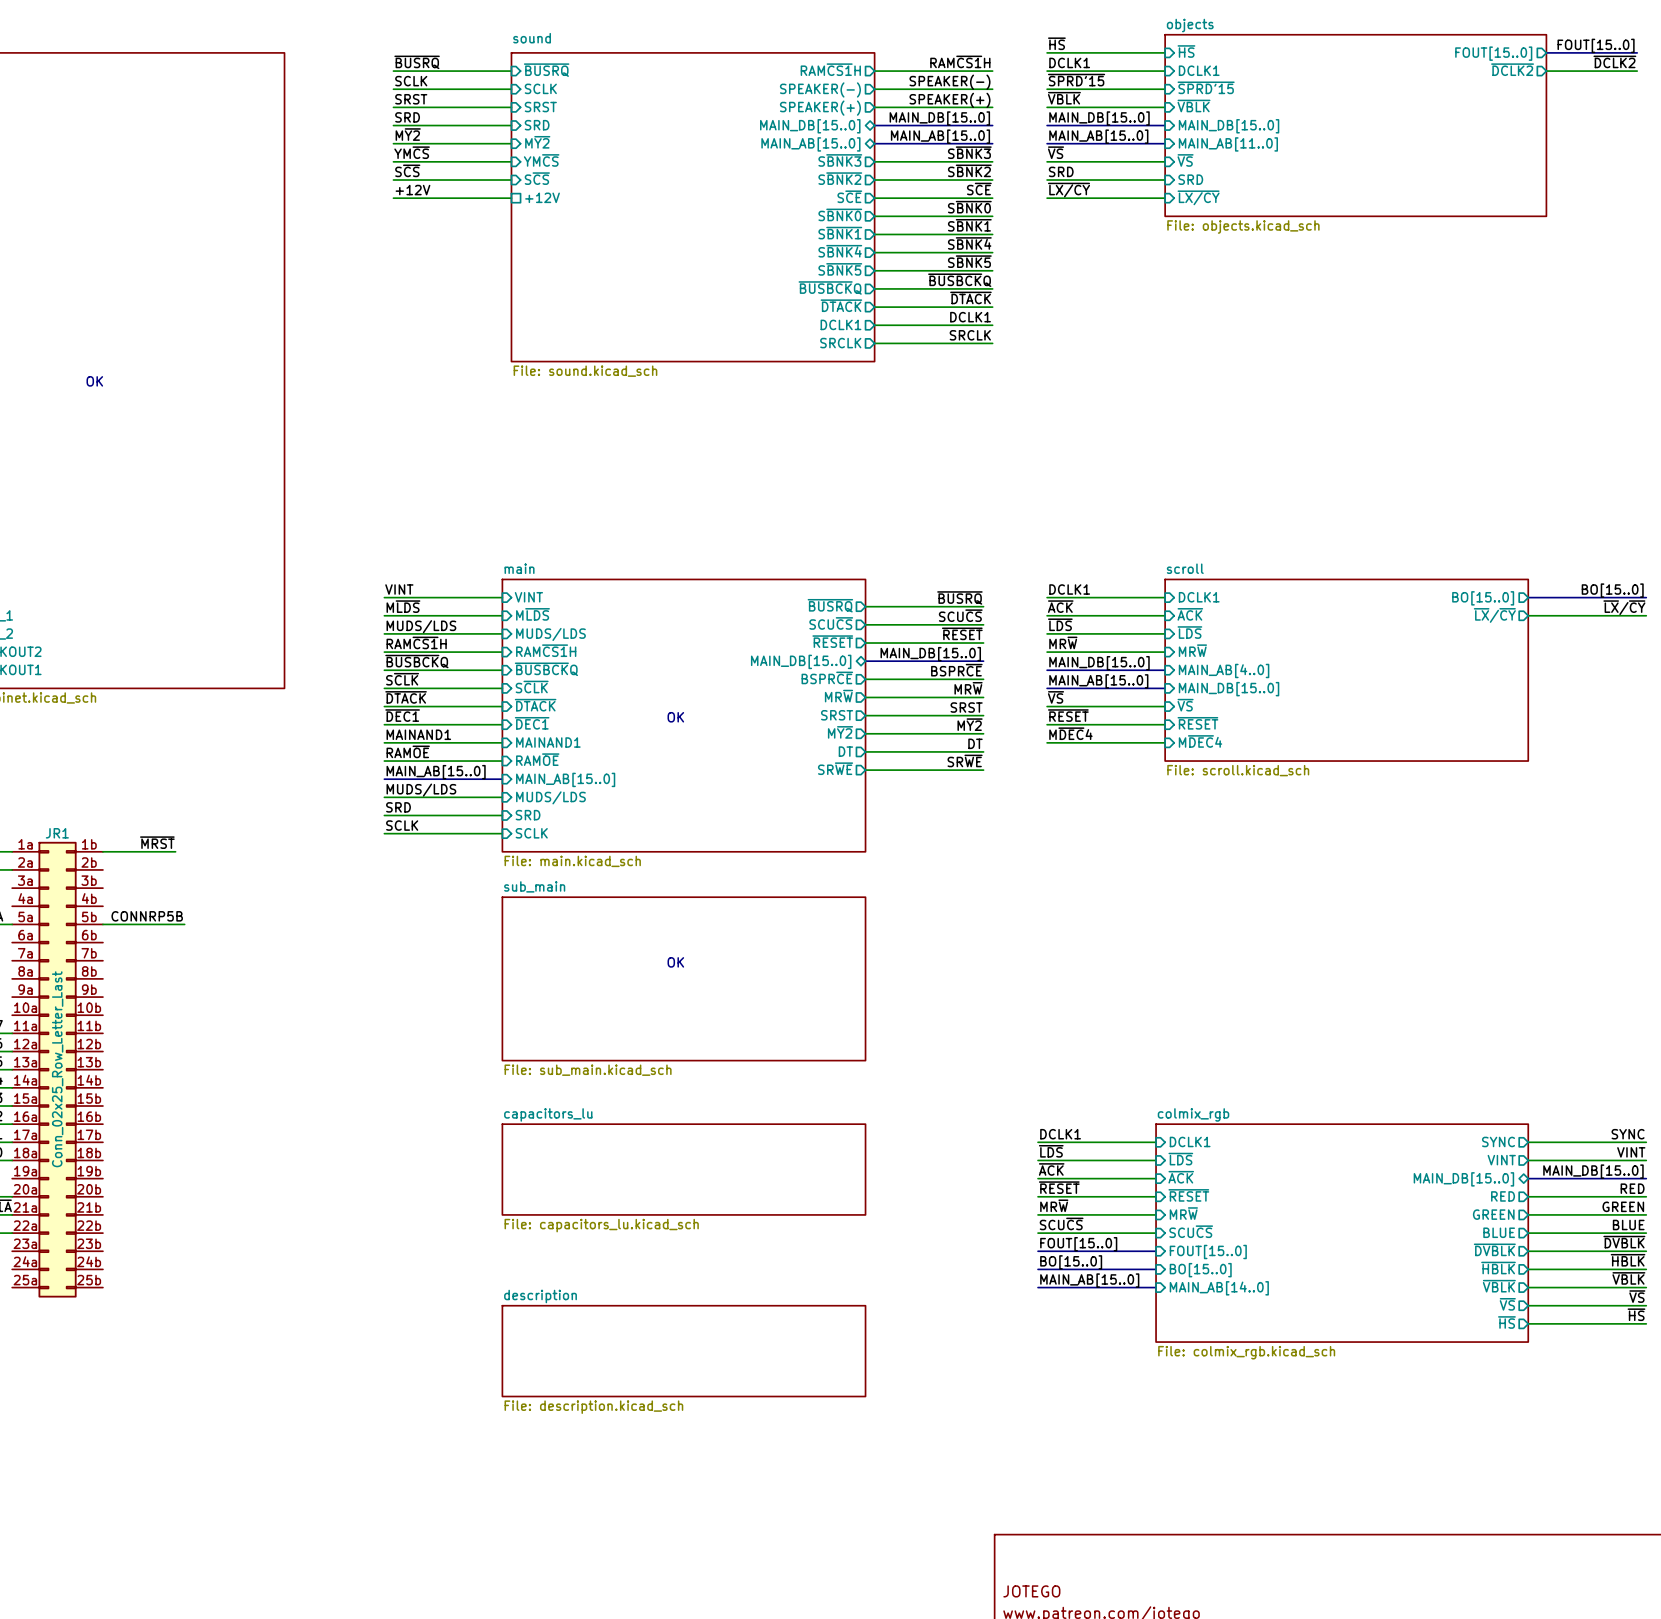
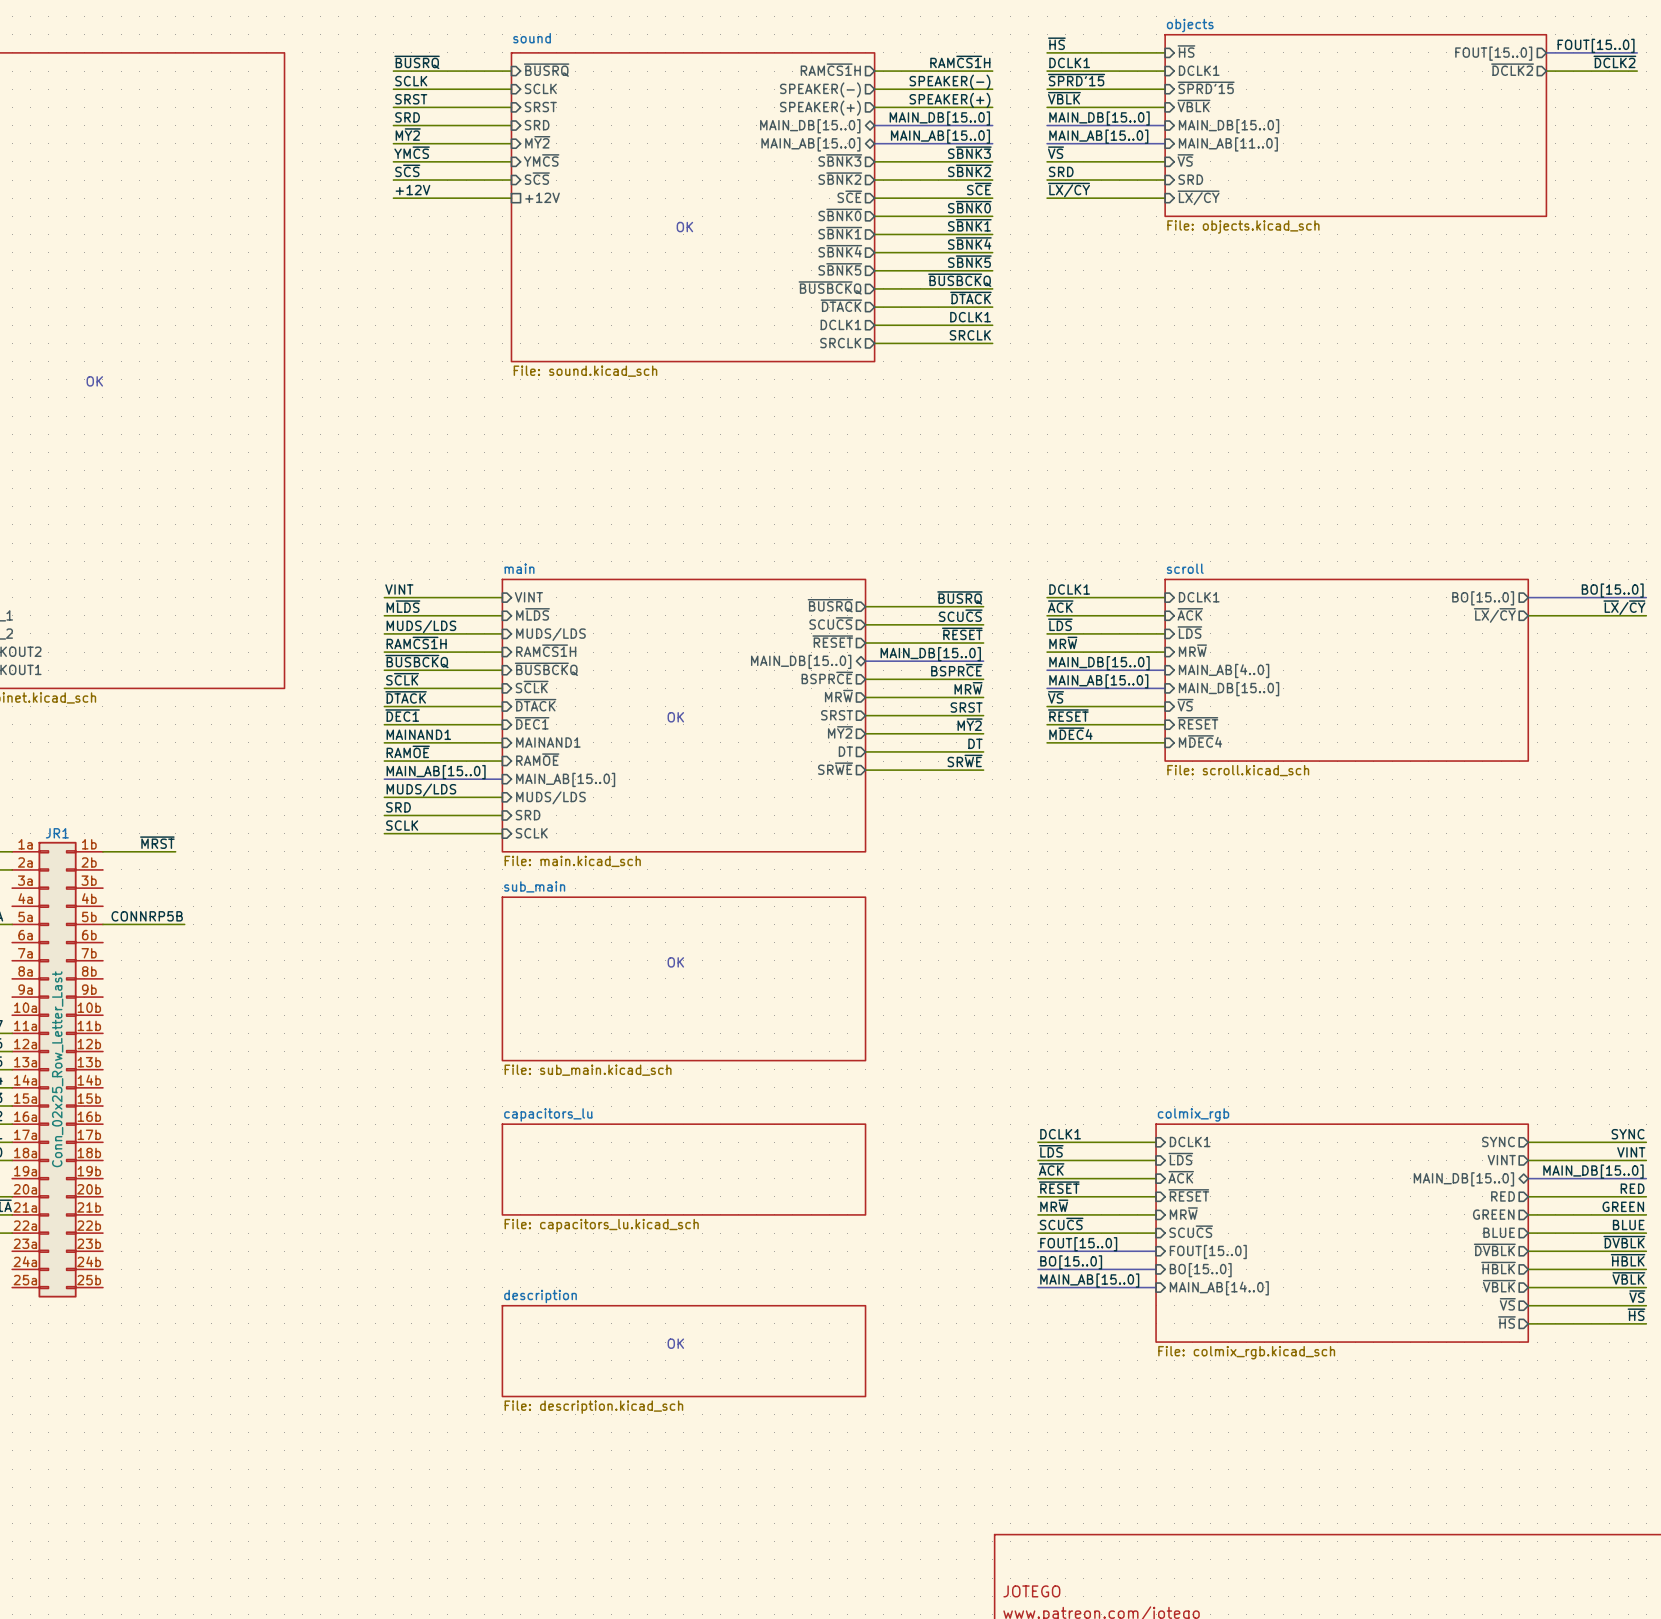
text: none -> OK (684, 227)
text: none -> OK (675, 1343)

